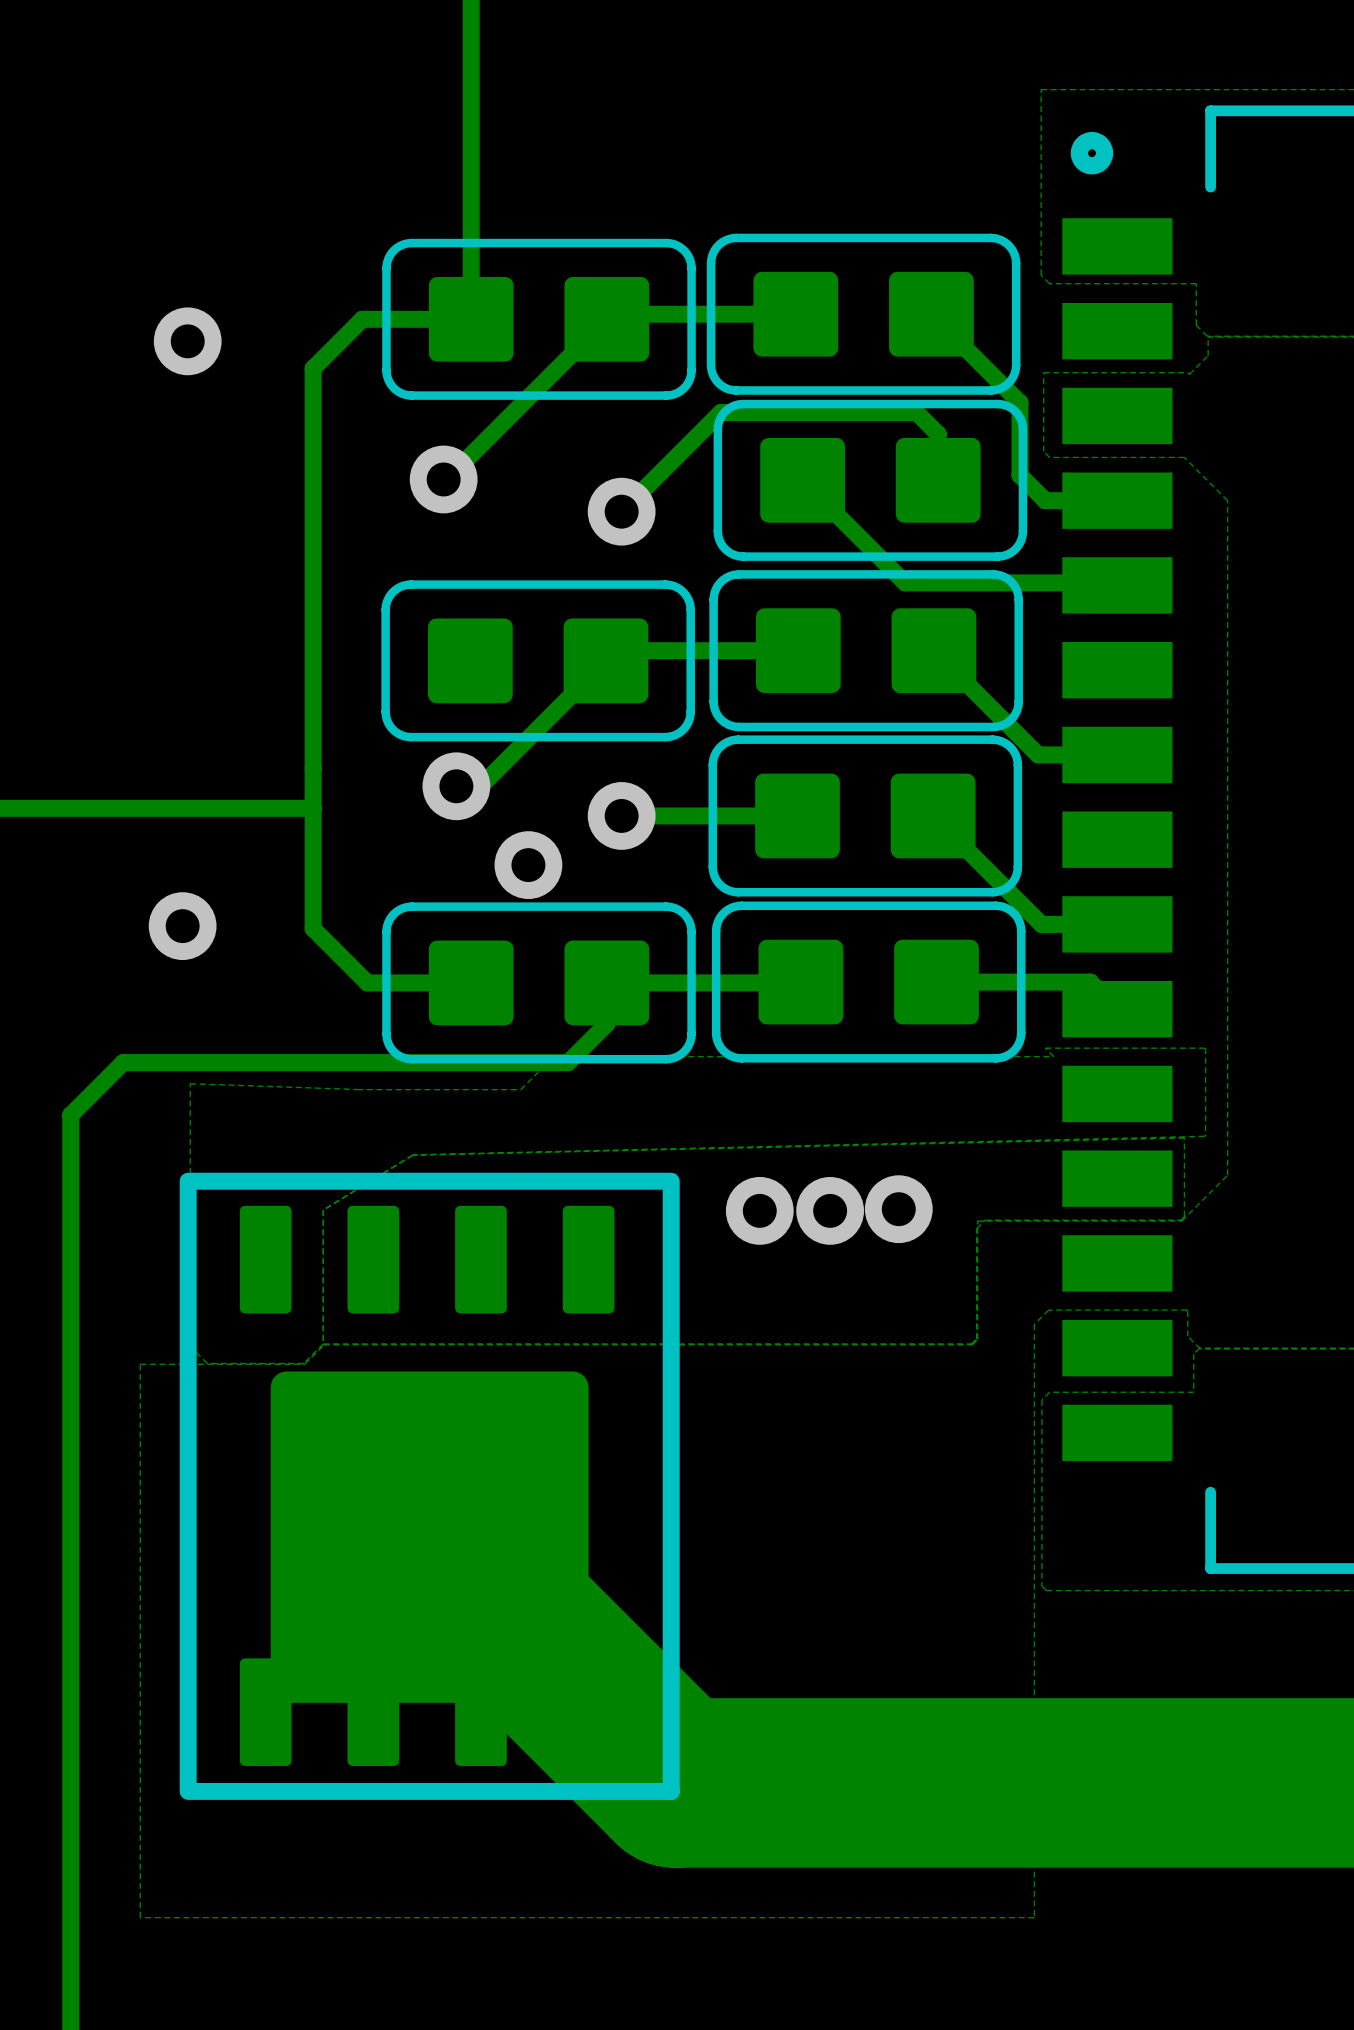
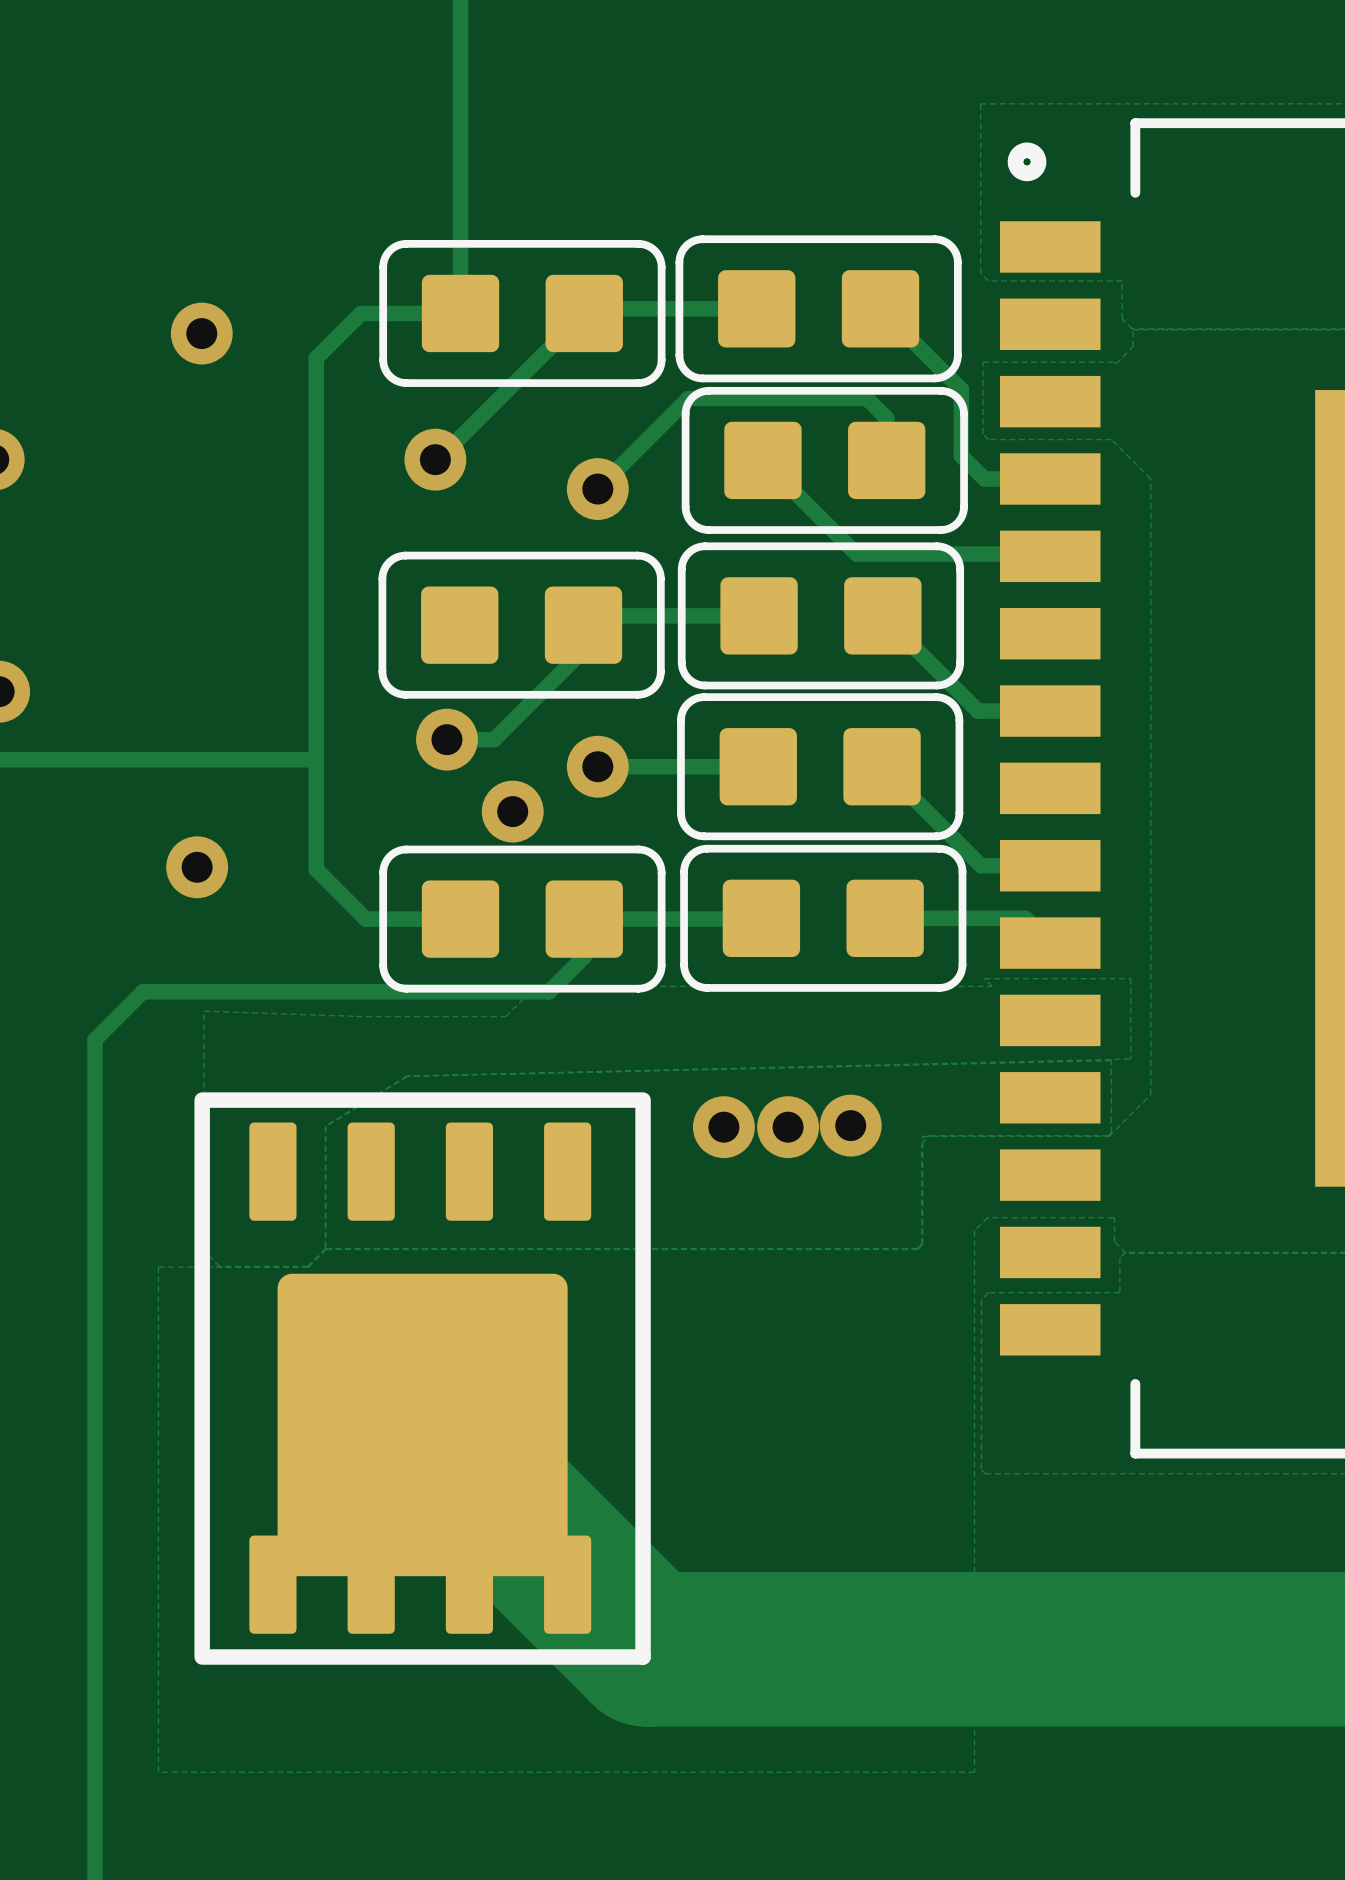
track: (605, 660) (480, 786) -> (583, 625) (583, 650) (494, 739) (469, 739)

